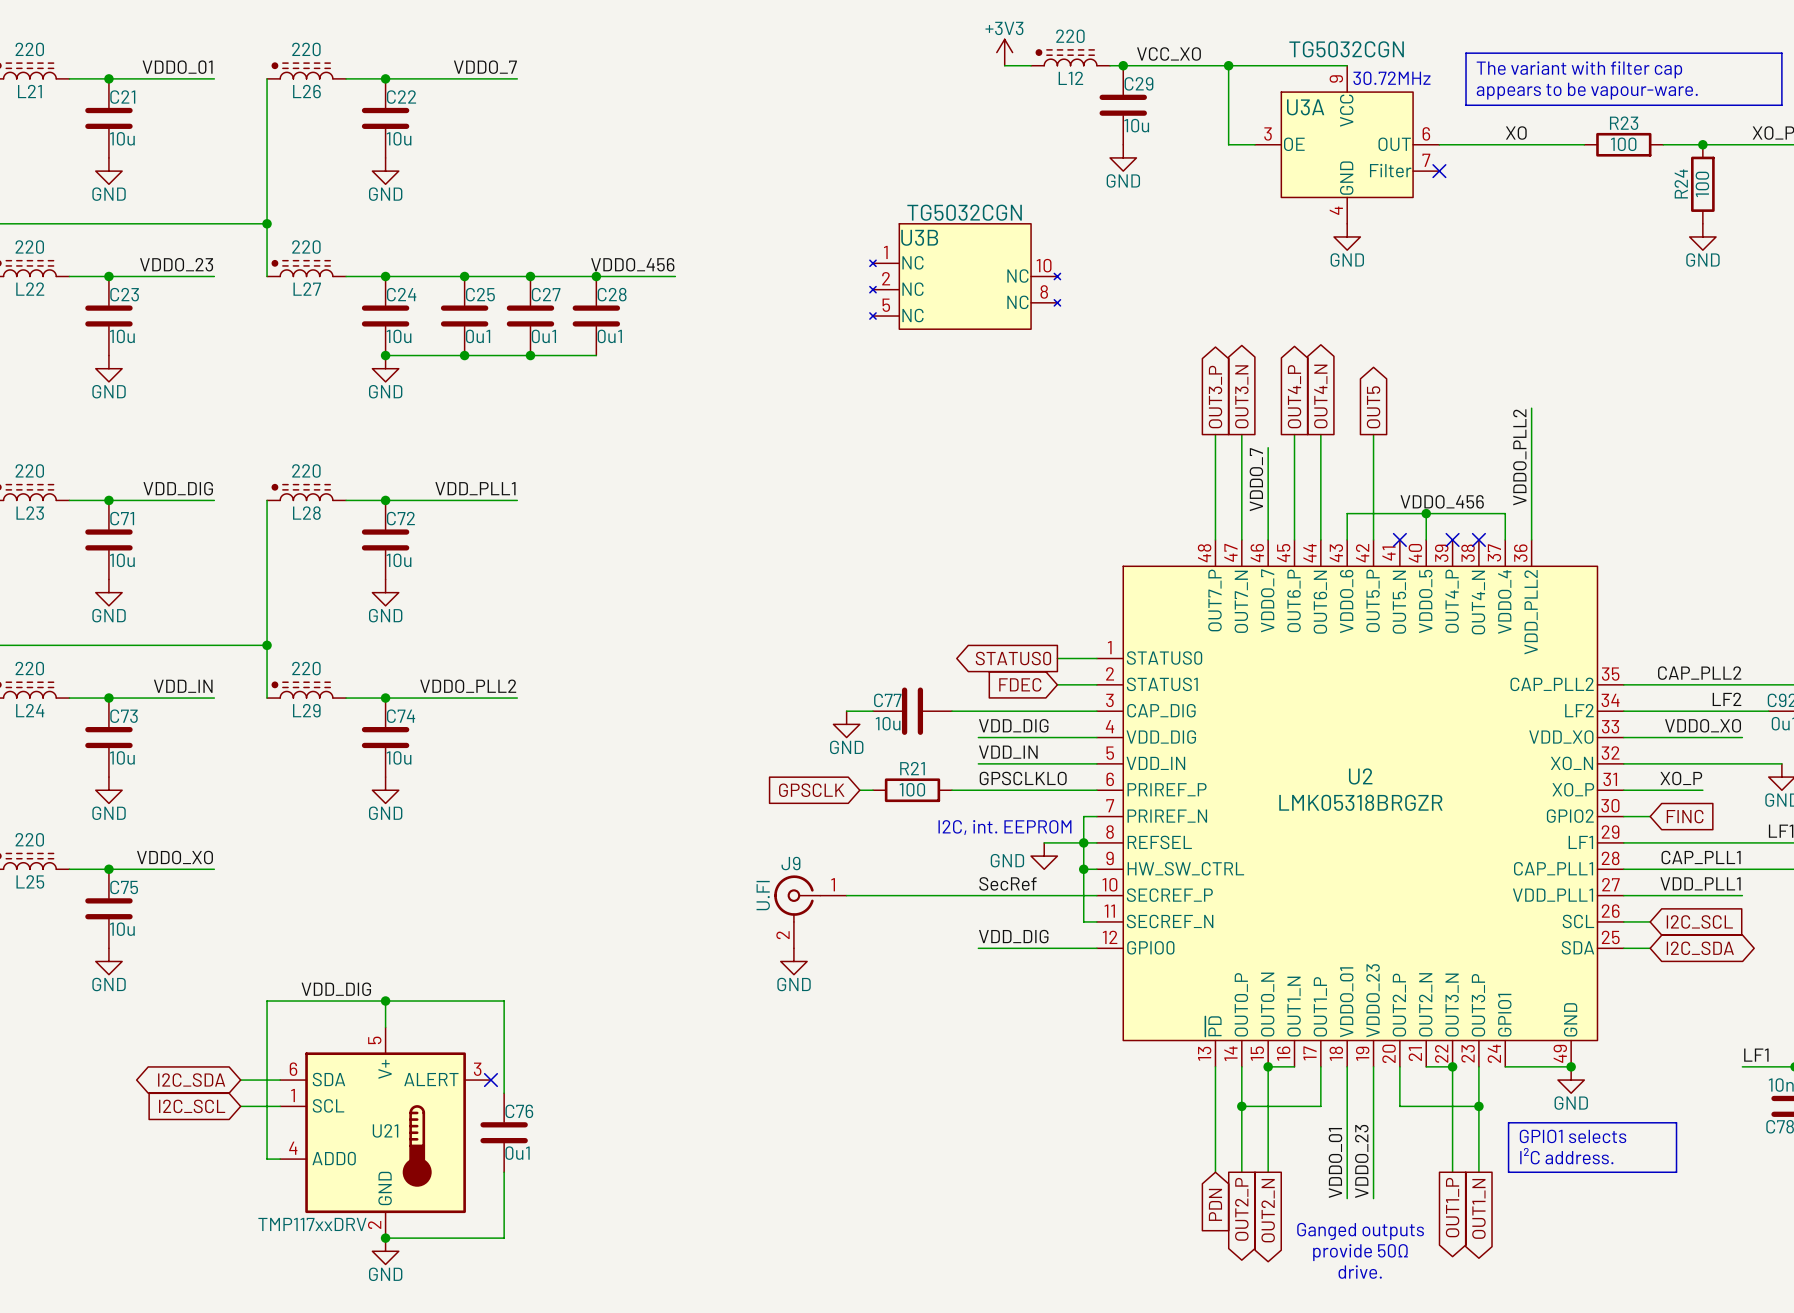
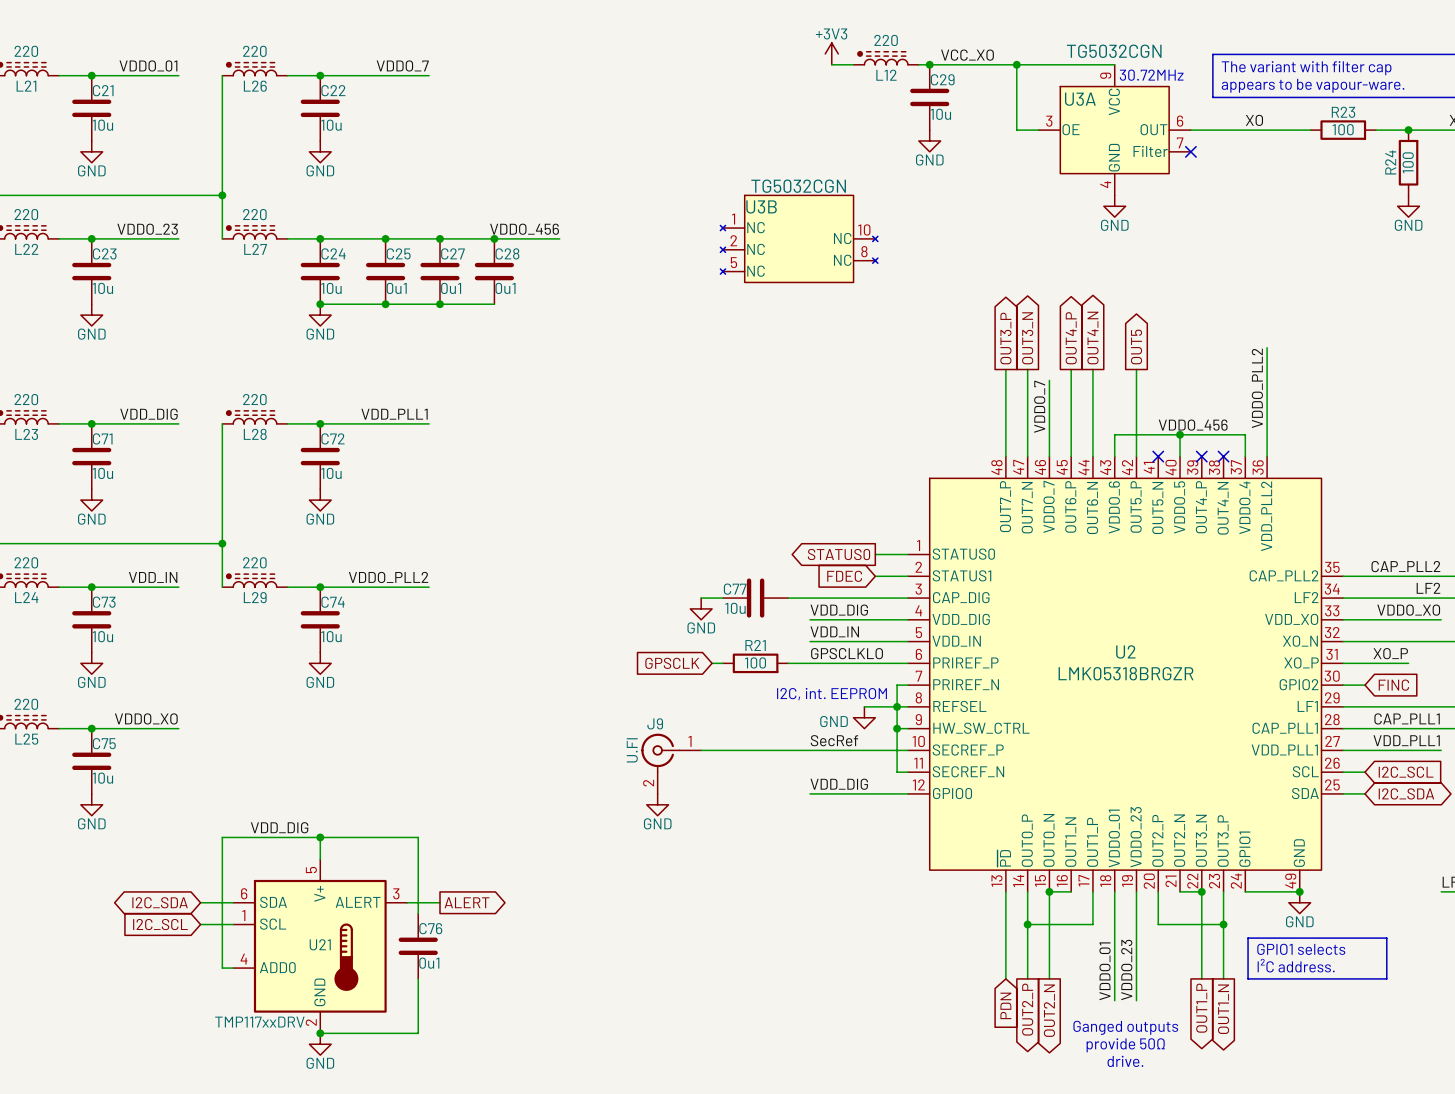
wire: none -> (407, 902) (439, 902)
no-connect mark: (490, 1080) -> none
global label: none -> ALERT (467, 902)

